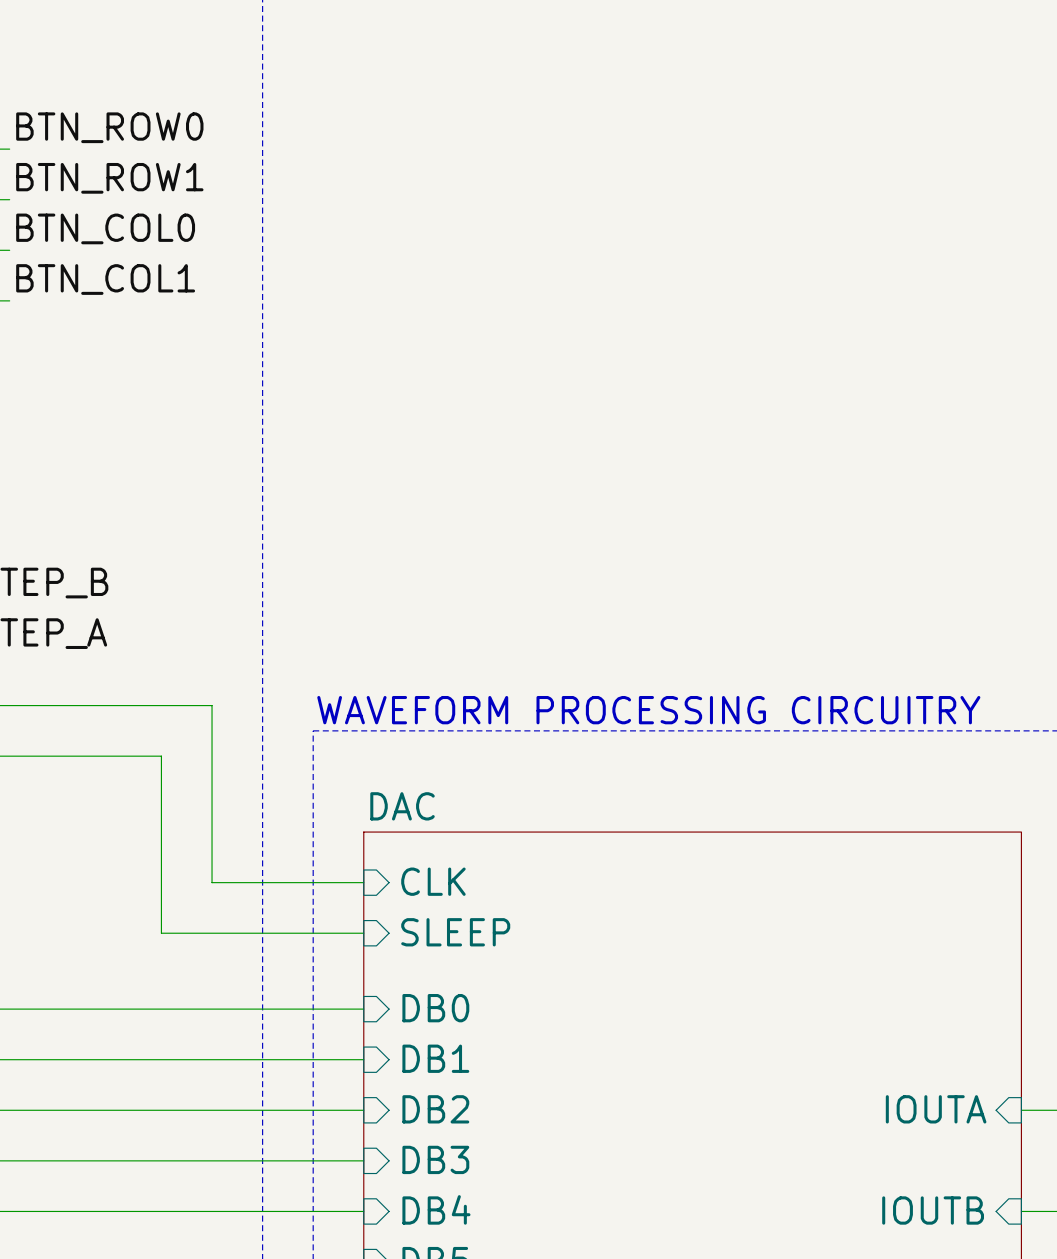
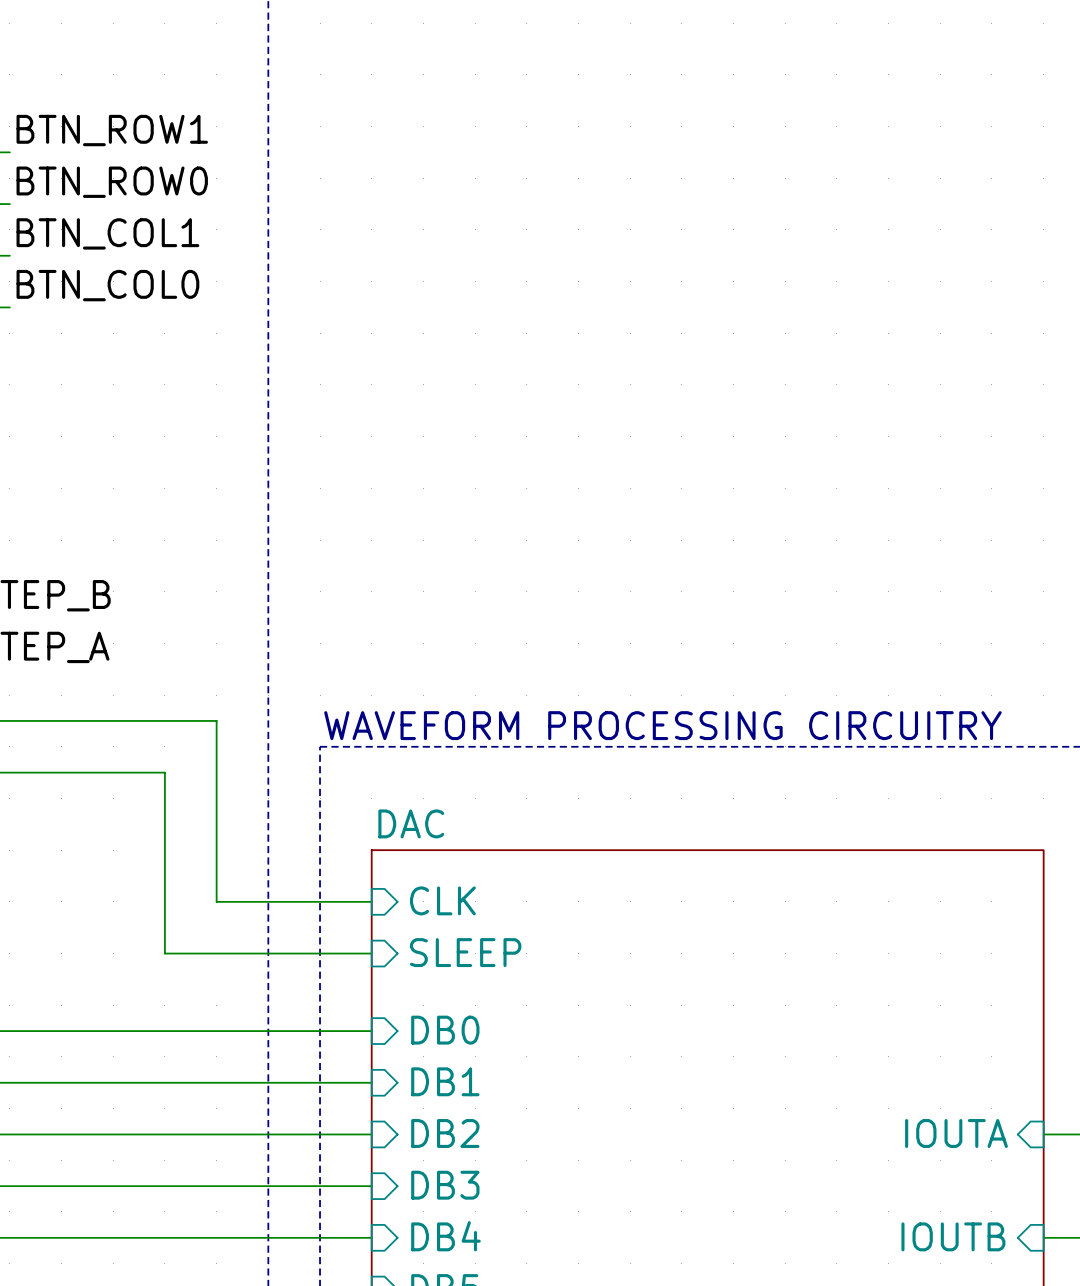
label: BTN_ROW0 (109, 127) -> BTN_ROW1 (112, 130)
label: BTN_ROW1 (109, 178) -> BTN_ROW0 (112, 182)
label: BTN_COL0 (105, 228) -> BTN_COL1 (107, 233)
label: BTN_COL1 (105, 279) -> BTN_COL0 (107, 285)

